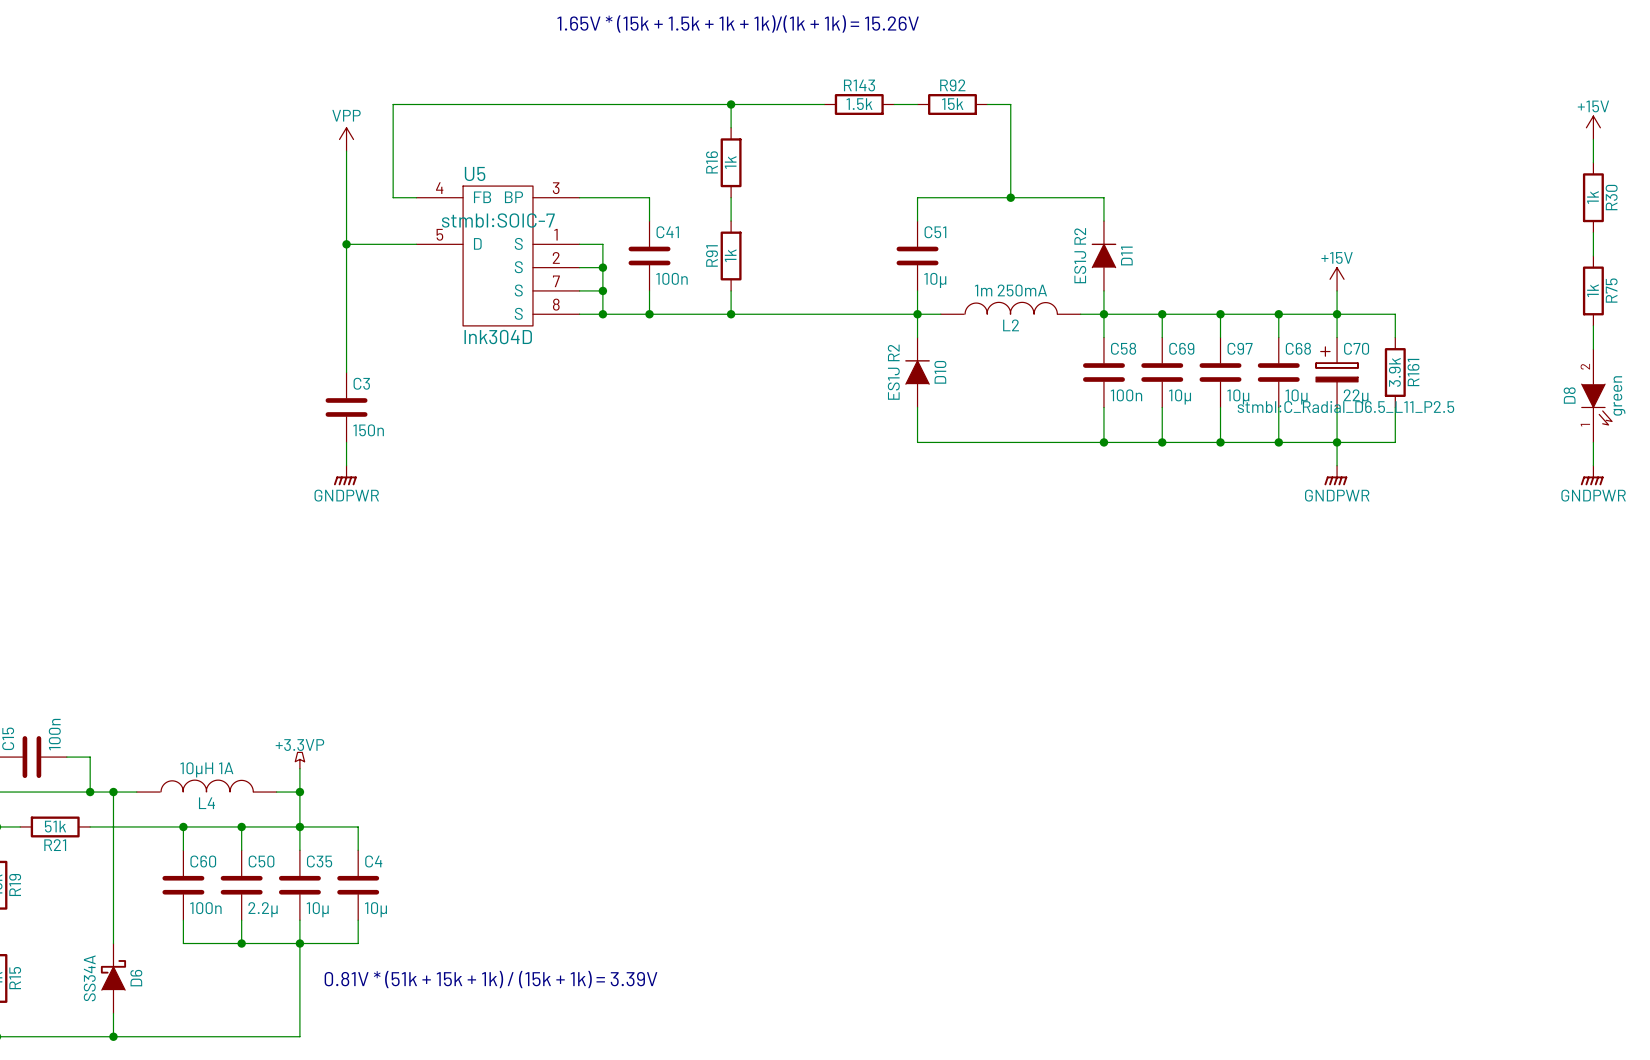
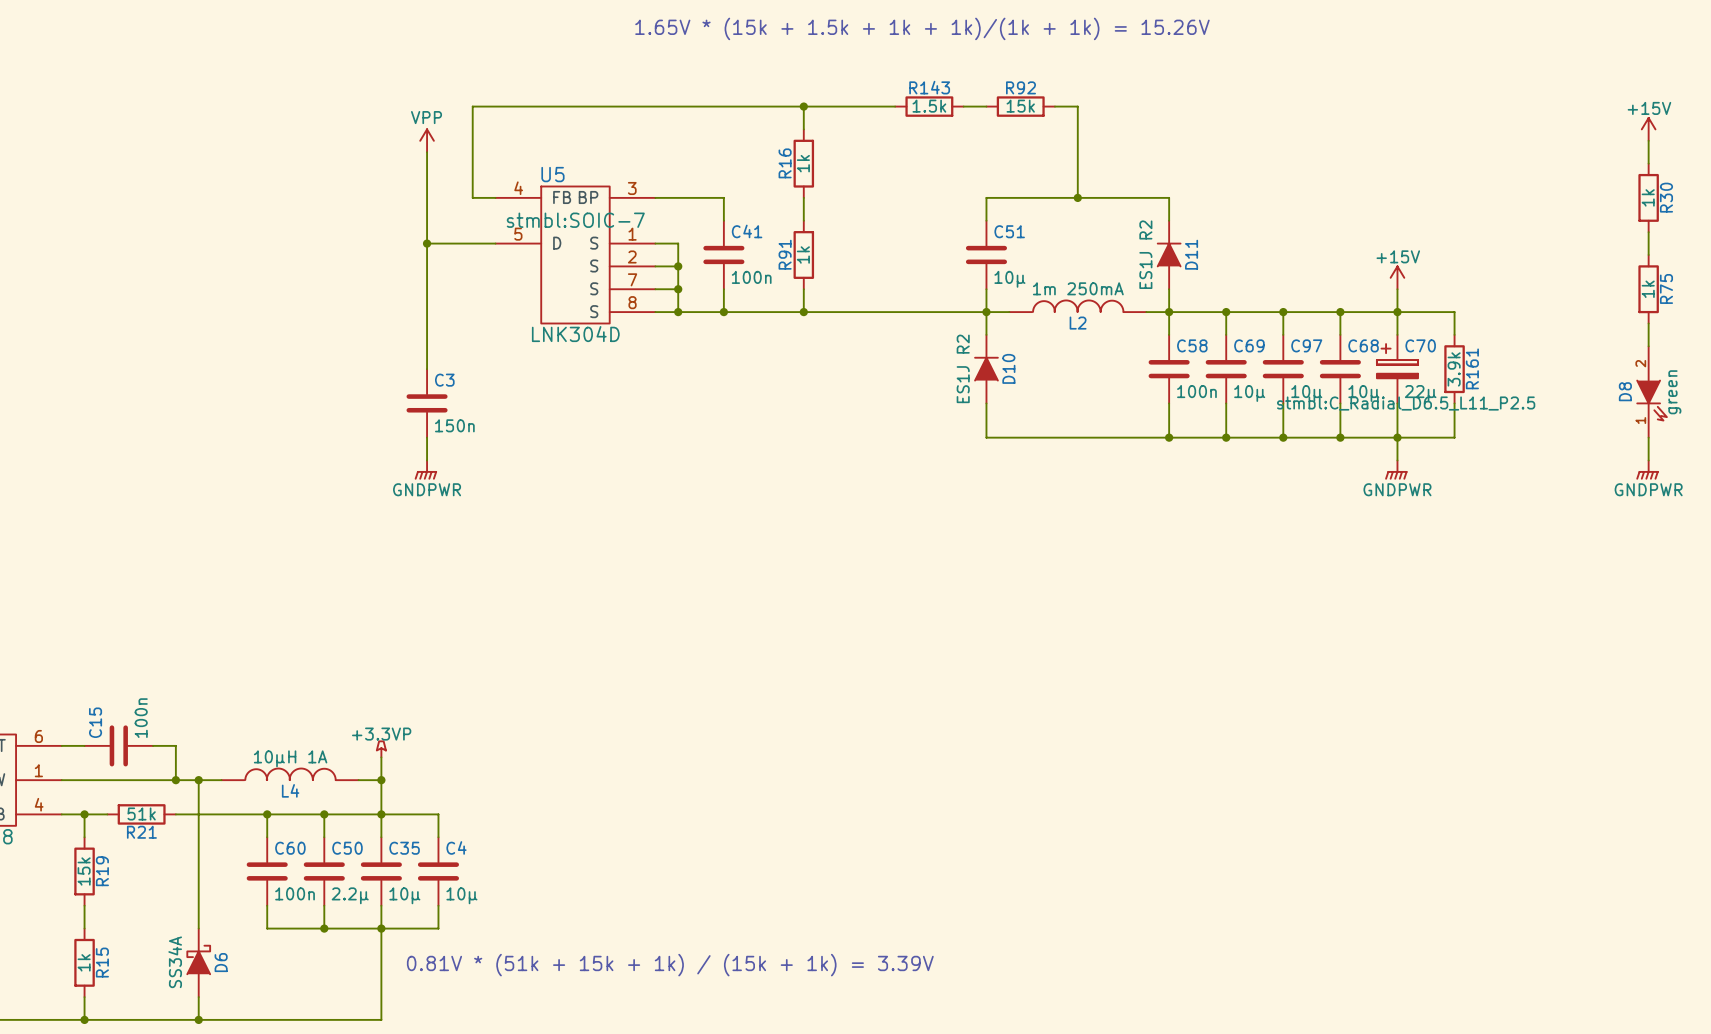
U5 value: lnk304D (498, 337) -> LNK304D (575, 334)

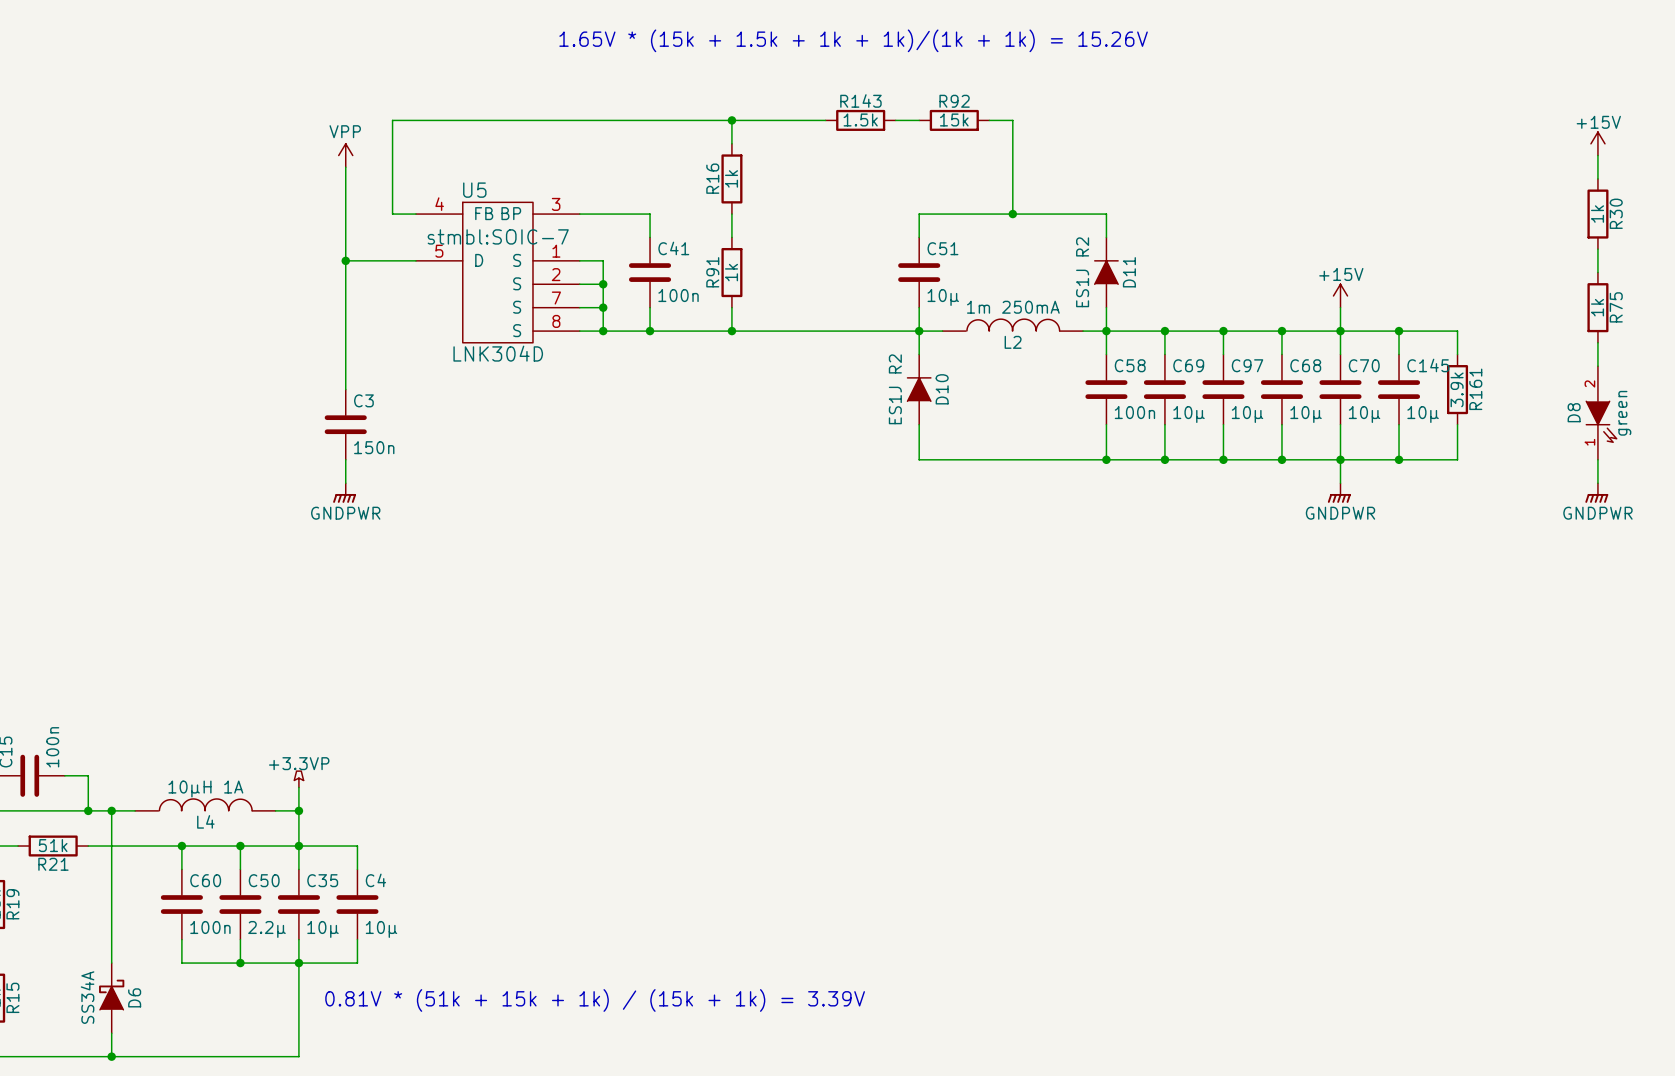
wire: none -> (1399, 331) (1457, 331) (1457, 354)
junction: none -> (1399, 331)
C70 symbol: [1376, 334, 1419, 404] -> [1319, 354, 1362, 425]
R161 position: (1454, 369) -> (1457, 389)
C145: none -> 10µ (1399, 389)
C70 value: 22µ (1420, 393) -> 10µ (1364, 414)
C70 text: stmbl:C_Radial_D6.5_L11_P2.5 (1406, 403) -> none
wire: none -> (1457, 424) (1457, 459) (1399, 459)
junction: none -> (1399, 459)

